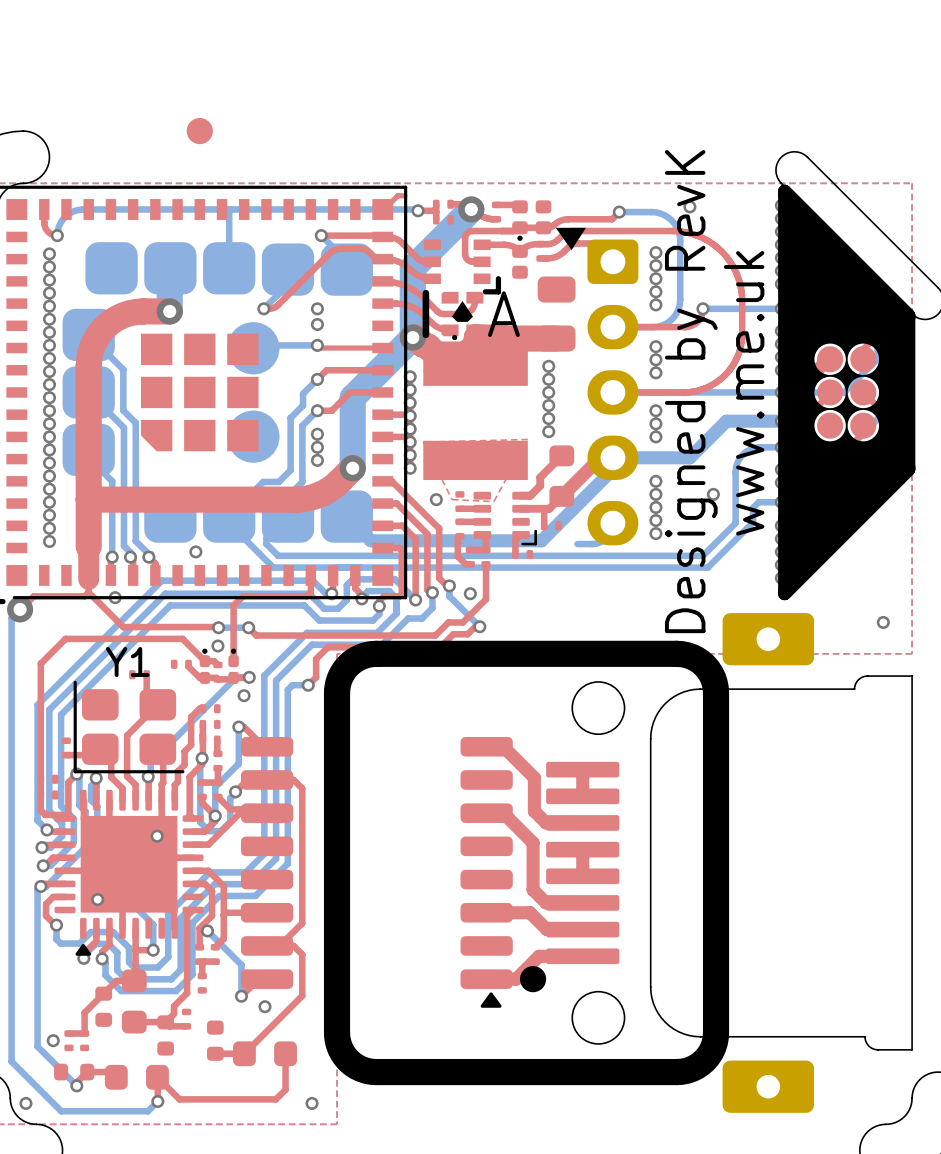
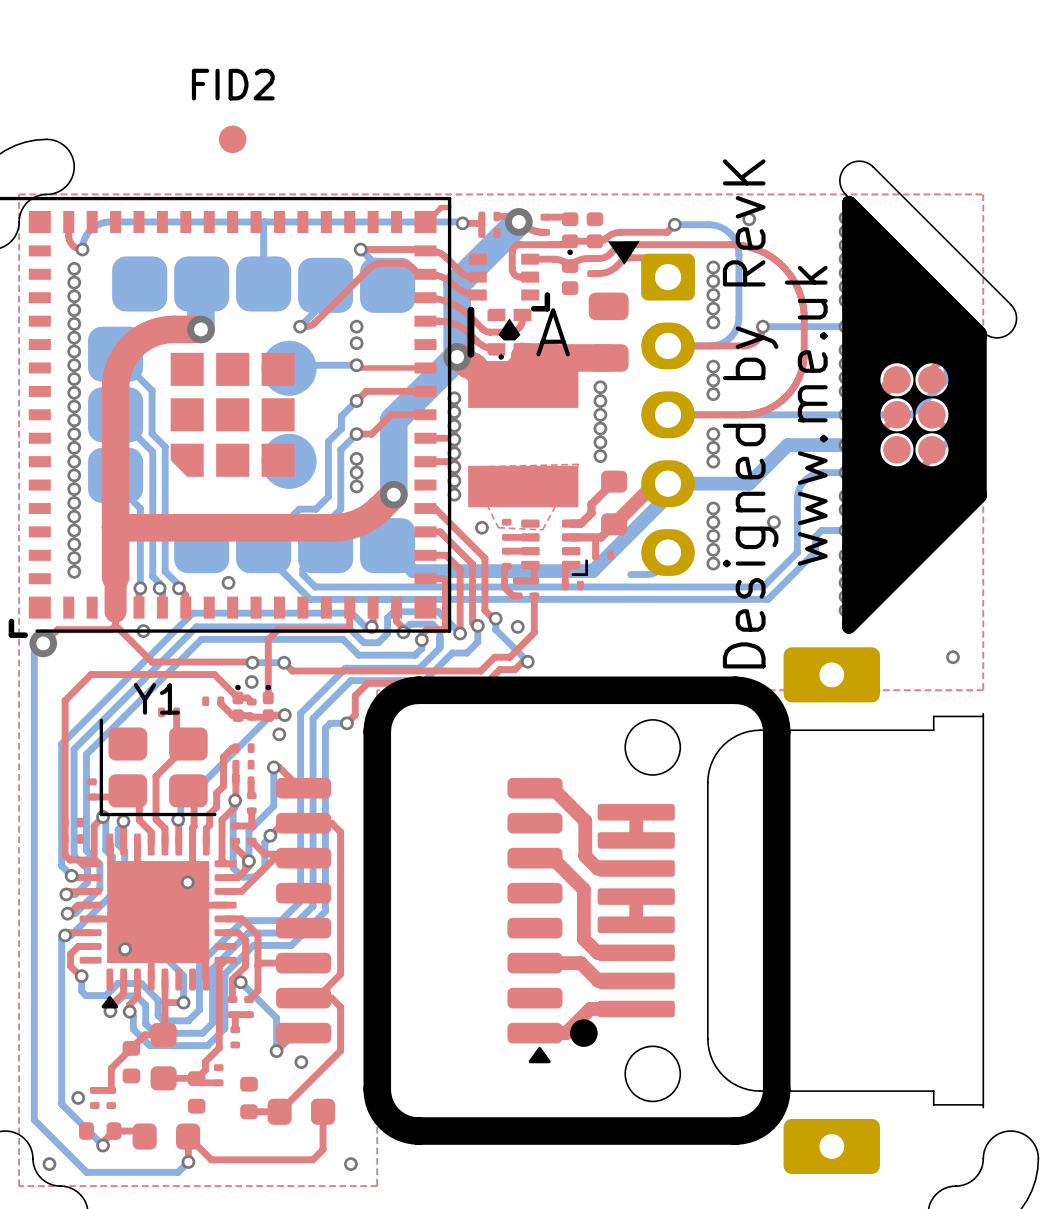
FID2 name: none -> FID2 (233, 84)
part footprint: [546, 613, 913, 1113] -> [597, 647, 984, 1175]

